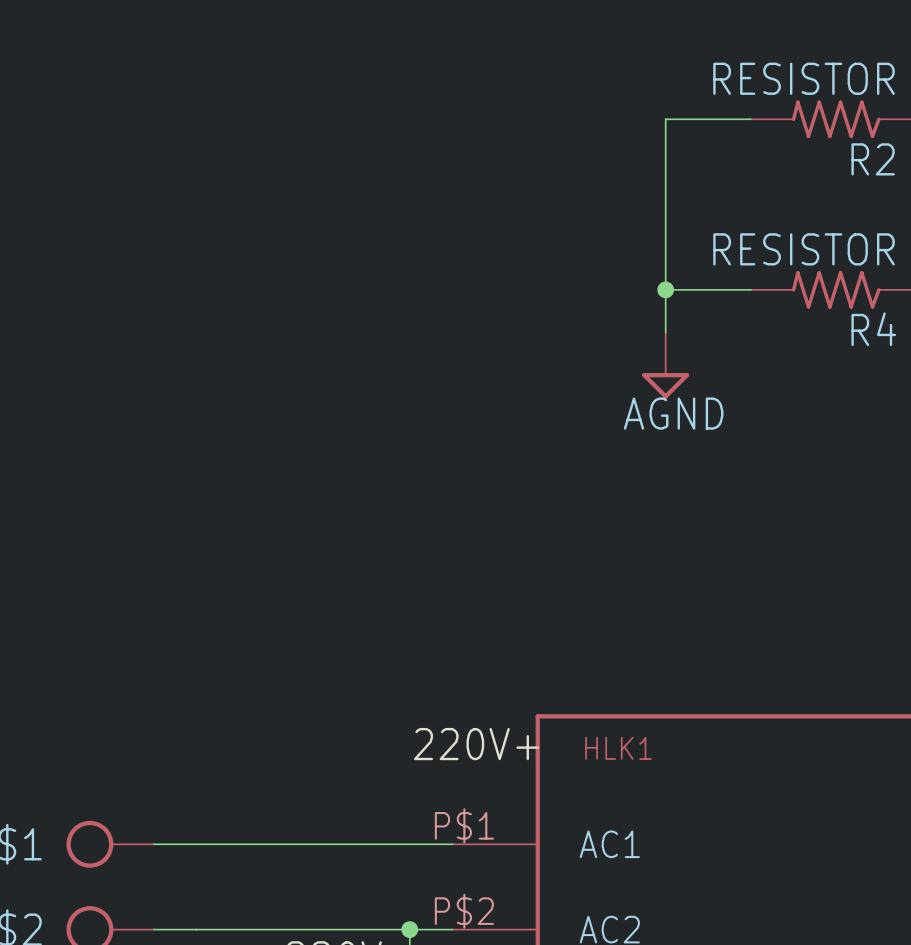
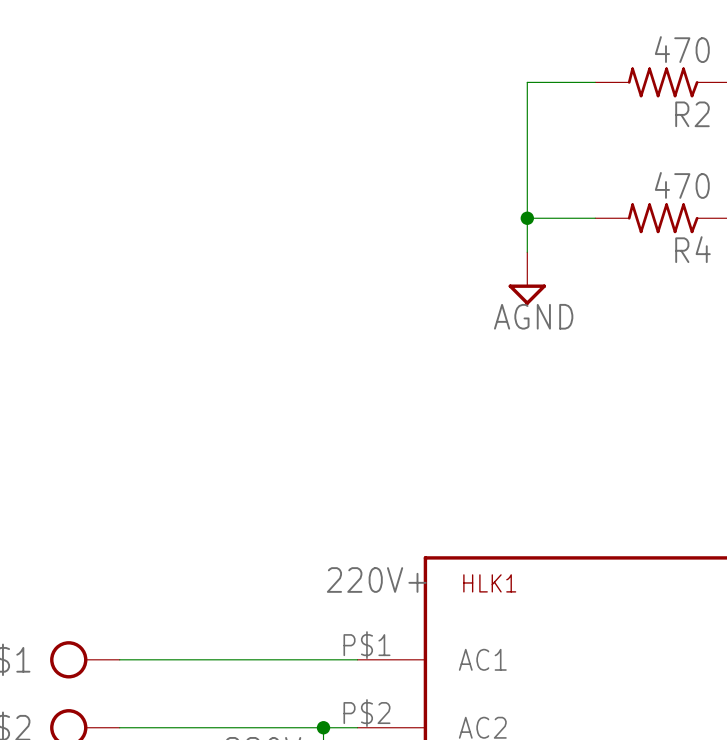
R2 value: RESISTOR (803, 78) -> 470 (682, 49)
R4 value: RESISTOR (803, 249) -> 470 (682, 185)

